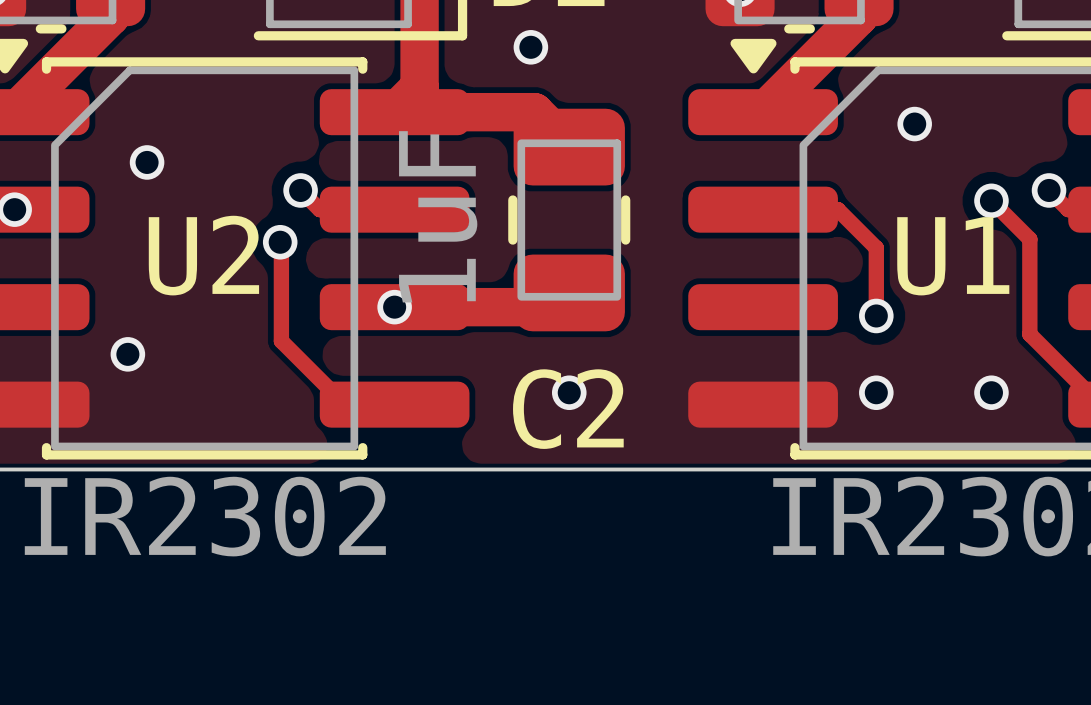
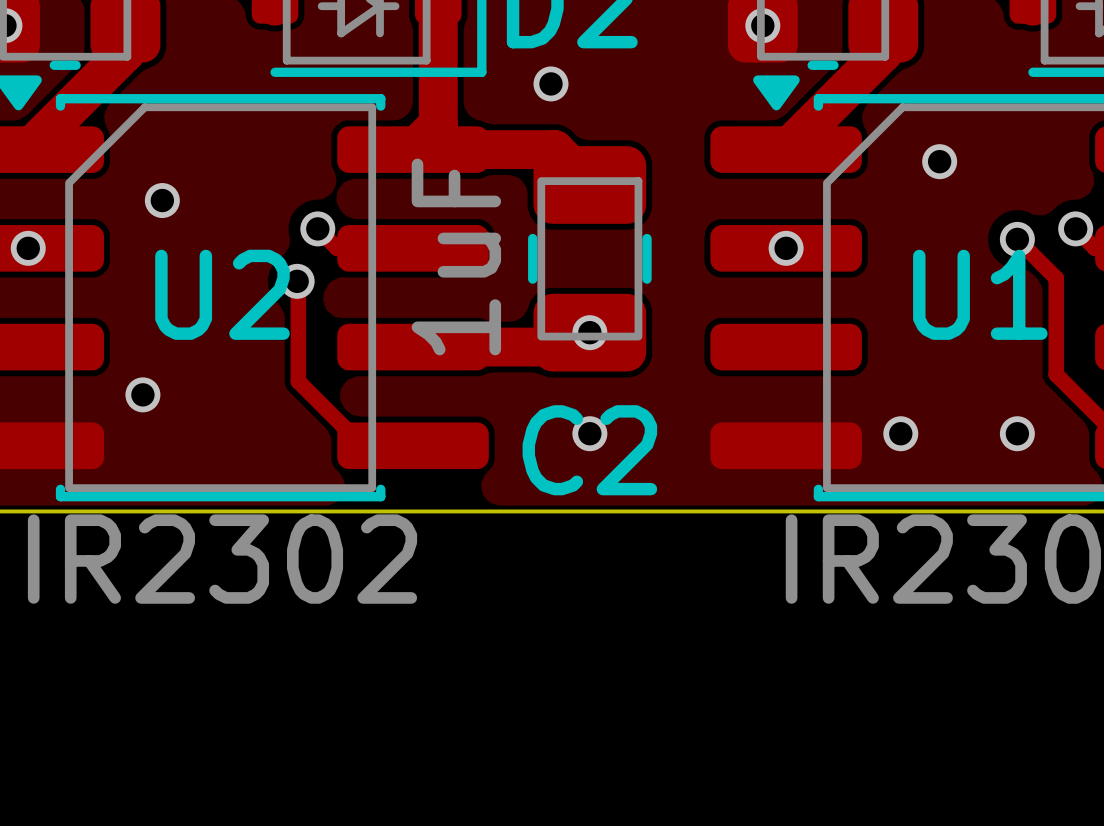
track: (763, 209) (837, 209) (876, 248) (876, 315) -> none
via: none -> (786, 248)
via: none -> (589, 332)
via: (394, 307) -> none
via: (876, 315) -> none

